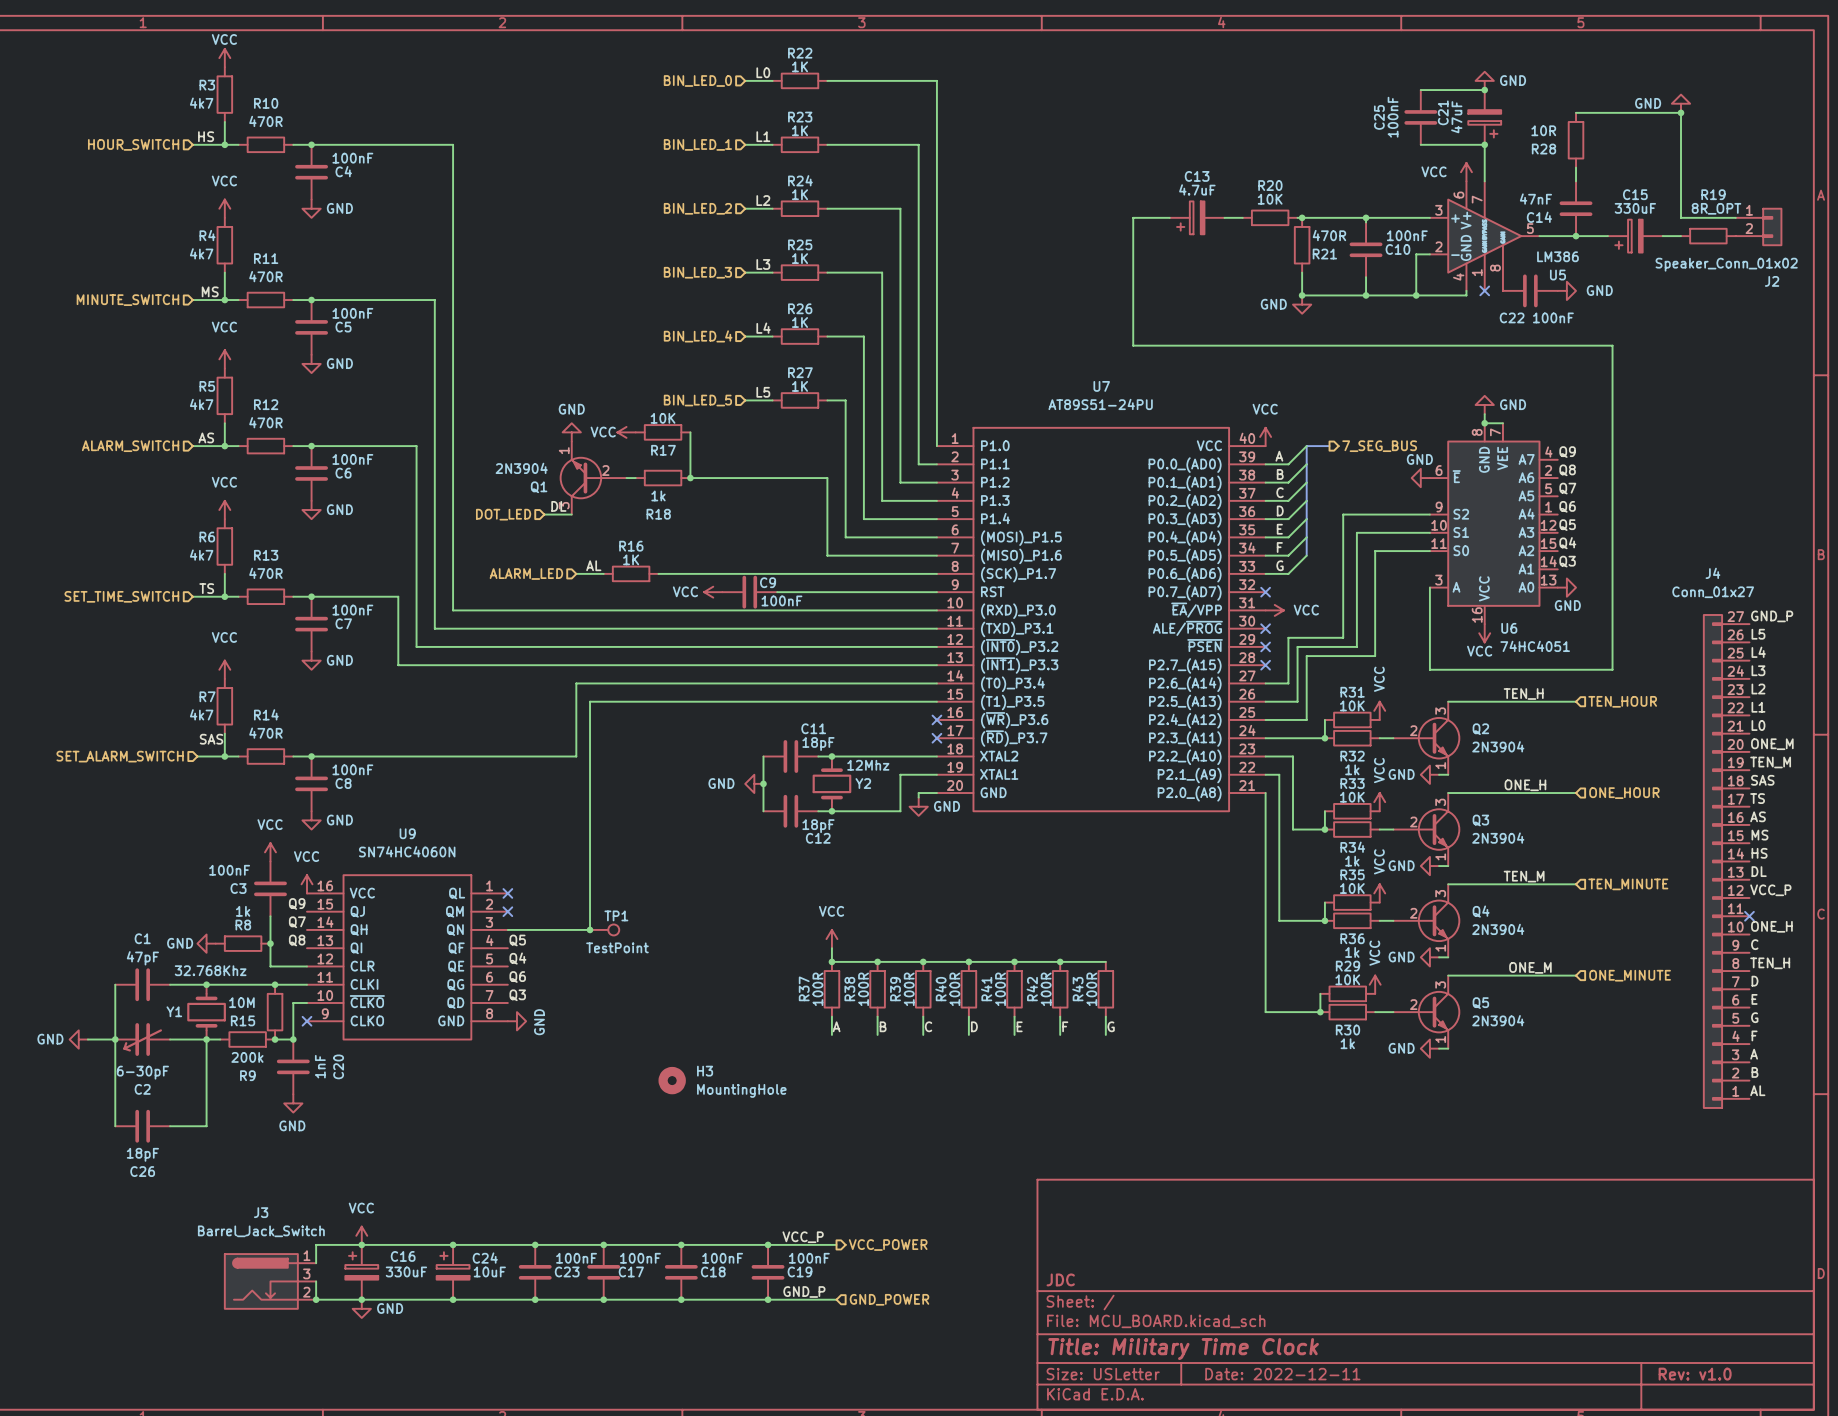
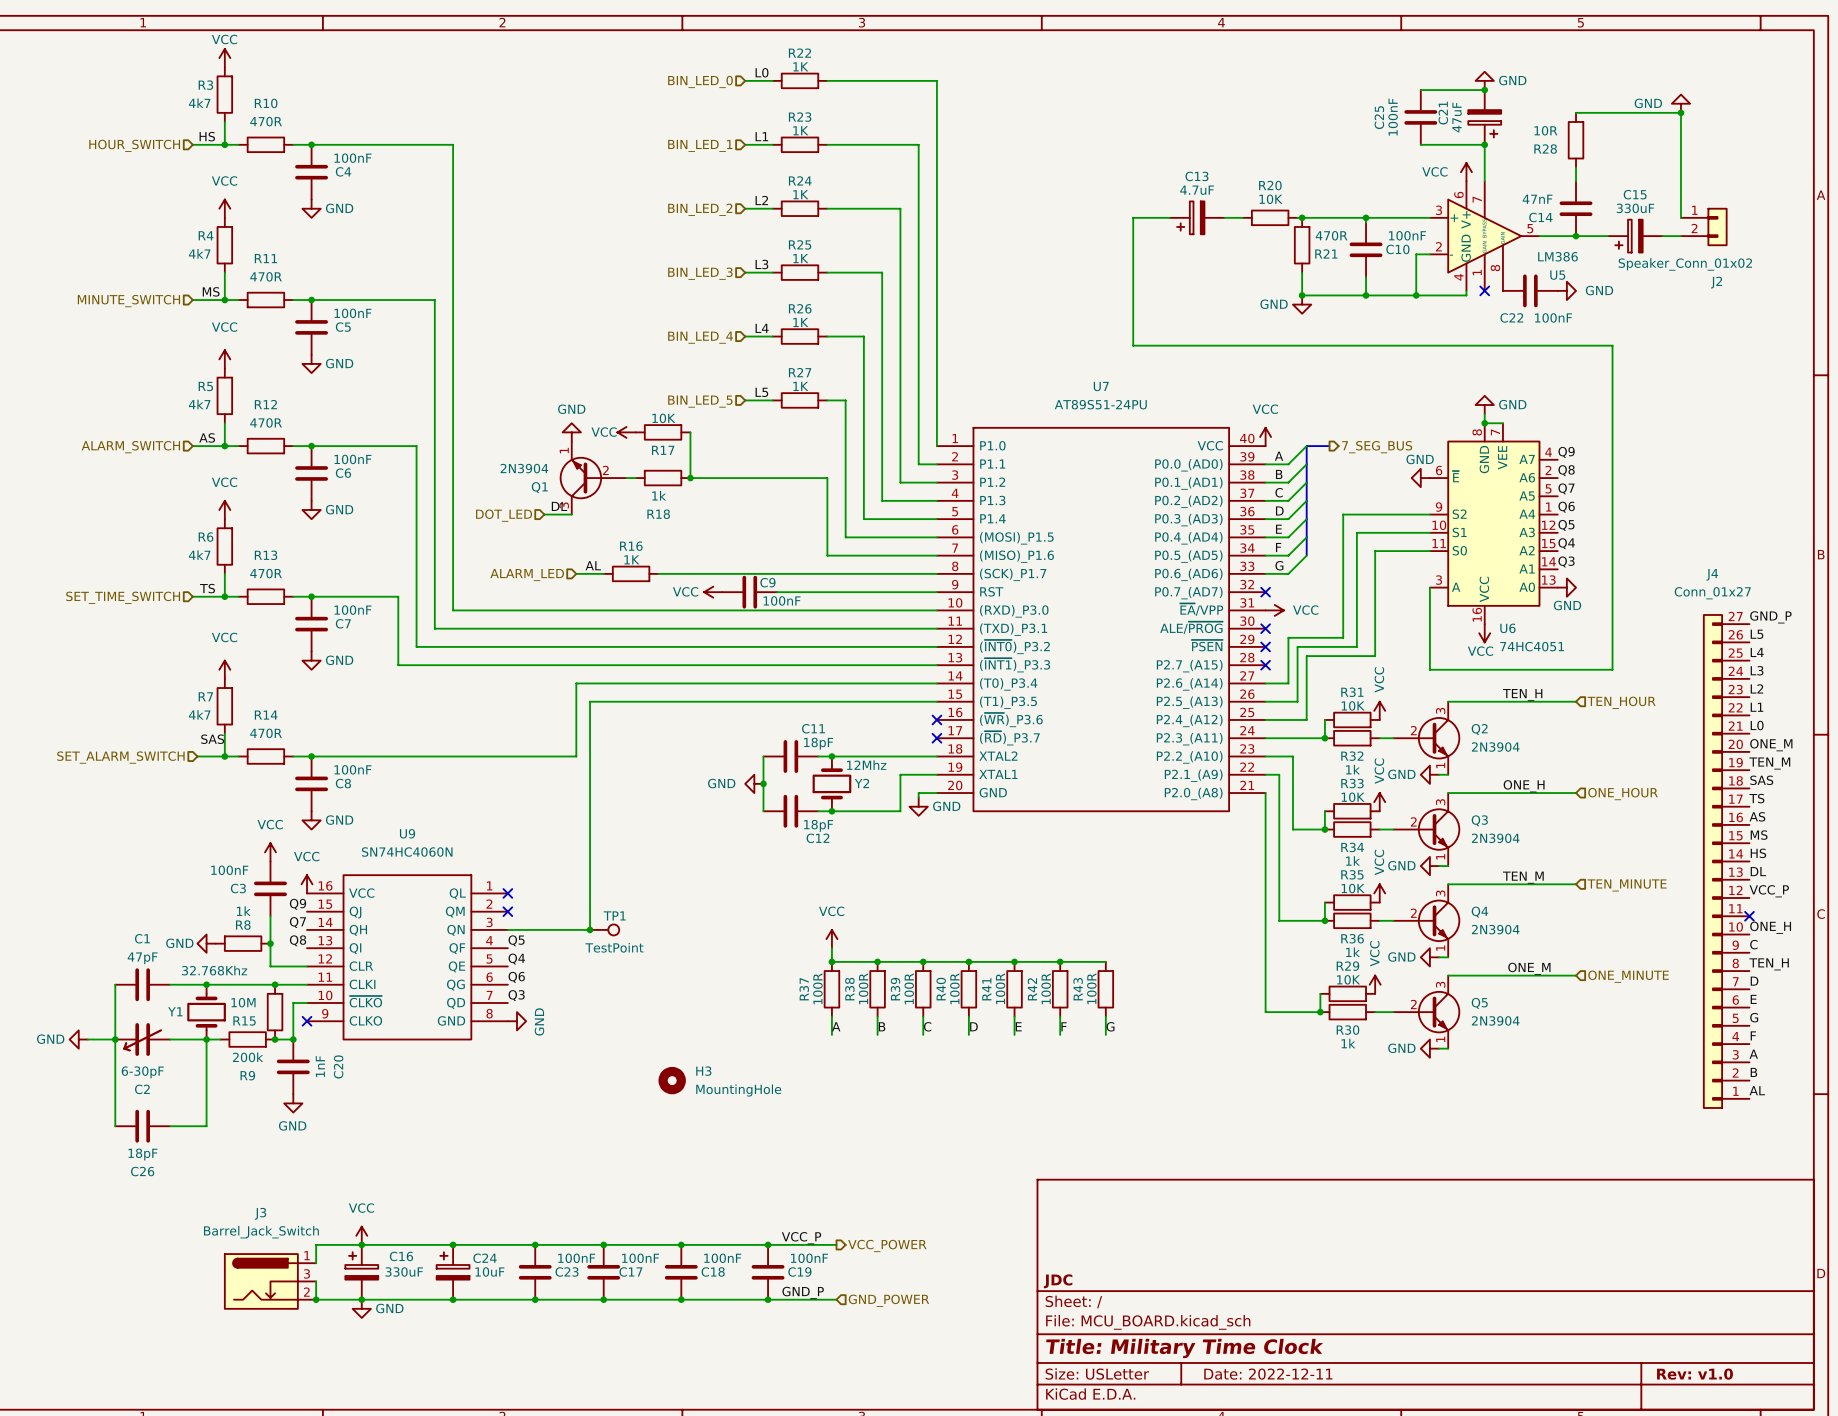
J2 position: (1759, 226) -> (1704, 226)
R19: 8R_OPT (1708, 236) -> none
J2 value position: Speaker_Conn_01x02 (1726, 264) -> Speaker_Conn_01x02 (1685, 264)

